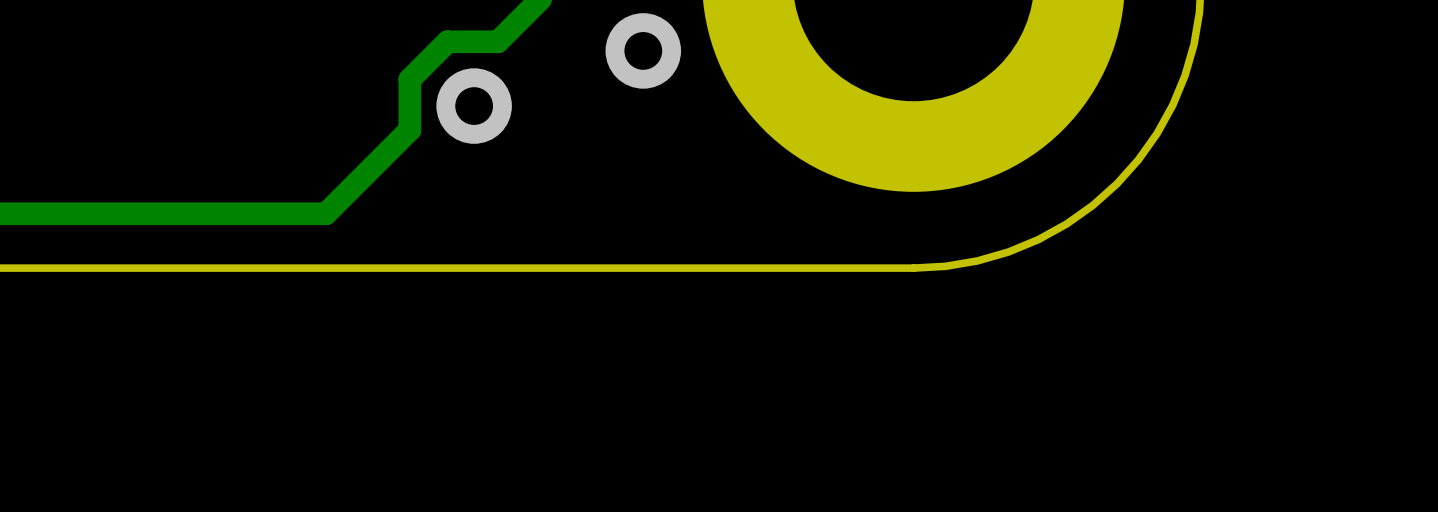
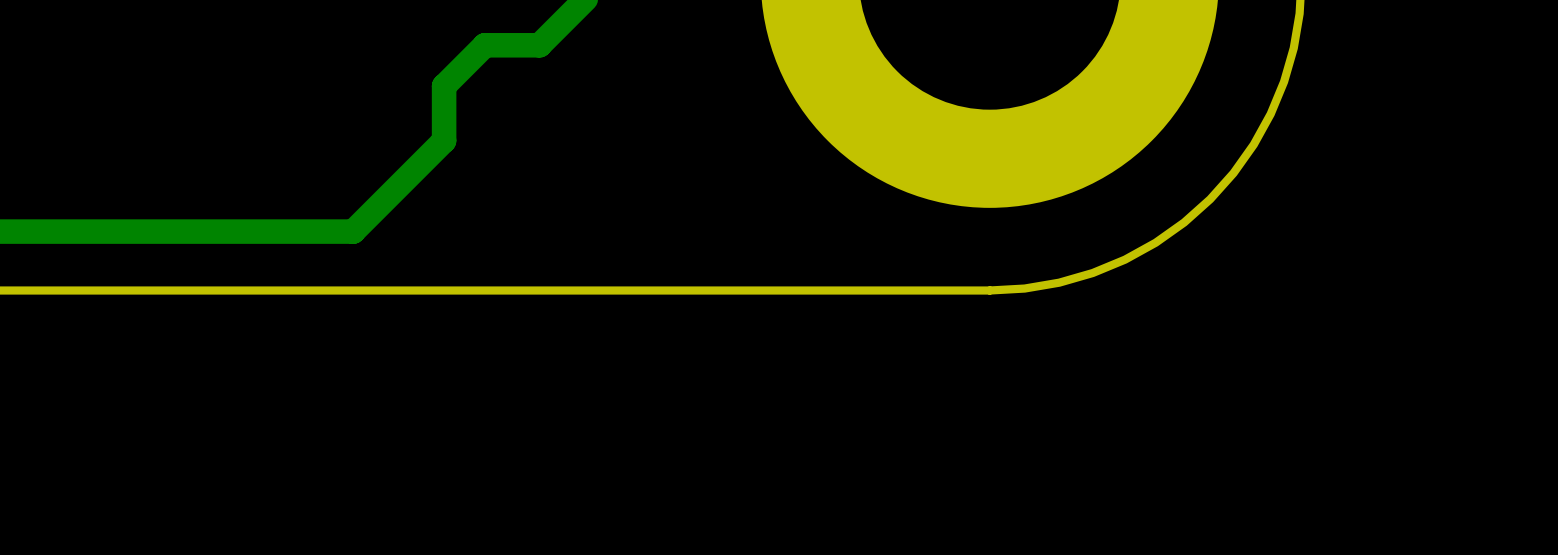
via: (643, 50) -> none
via: (474, 106) -> none

